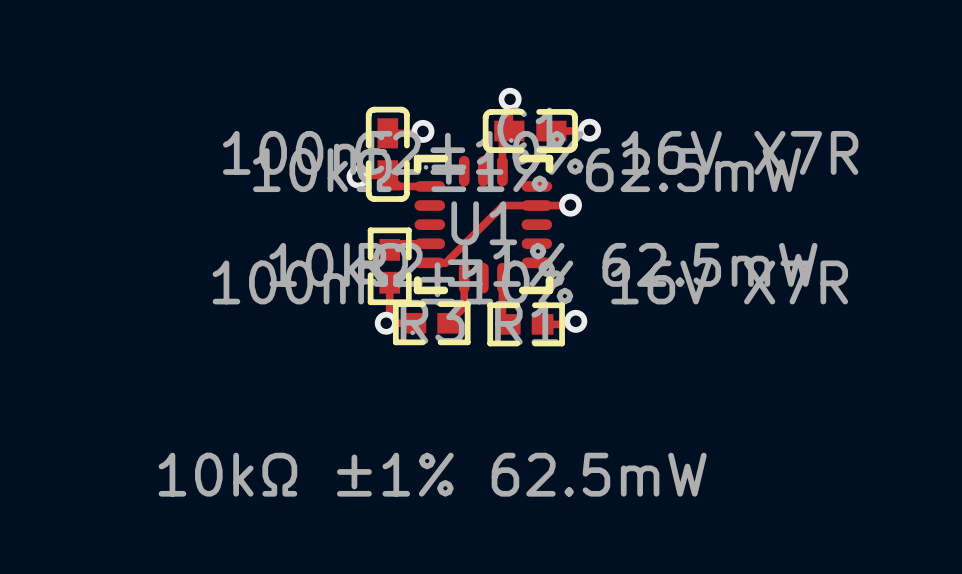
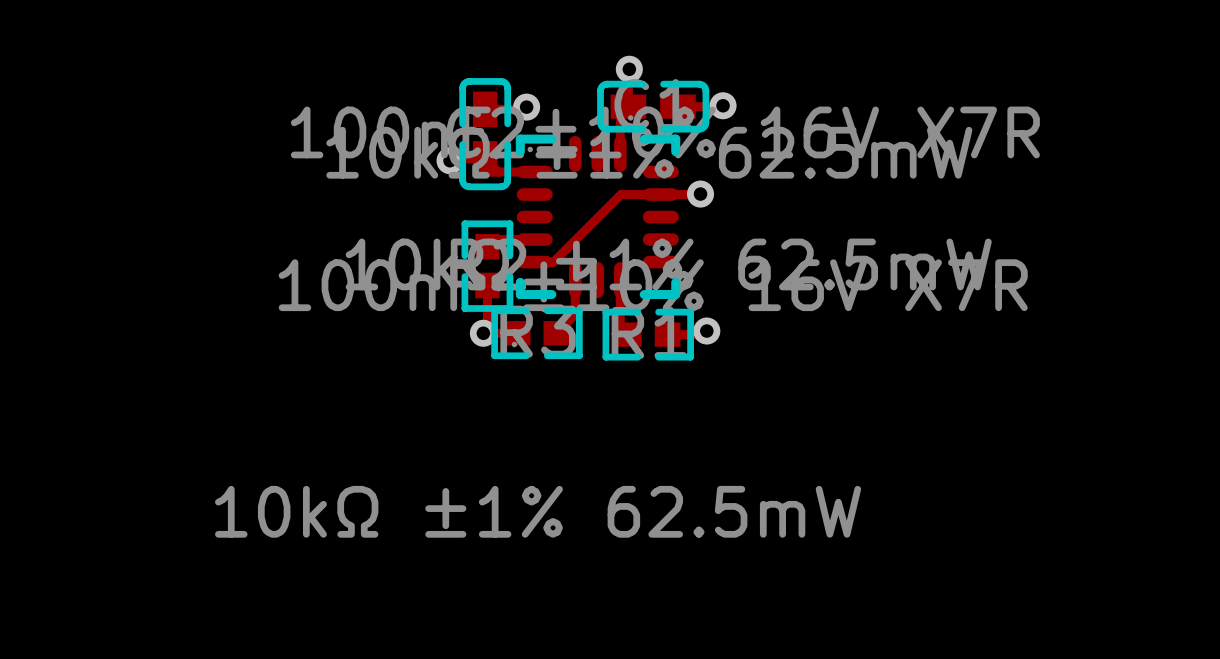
U1 name: U1 (484, 223) -> none

